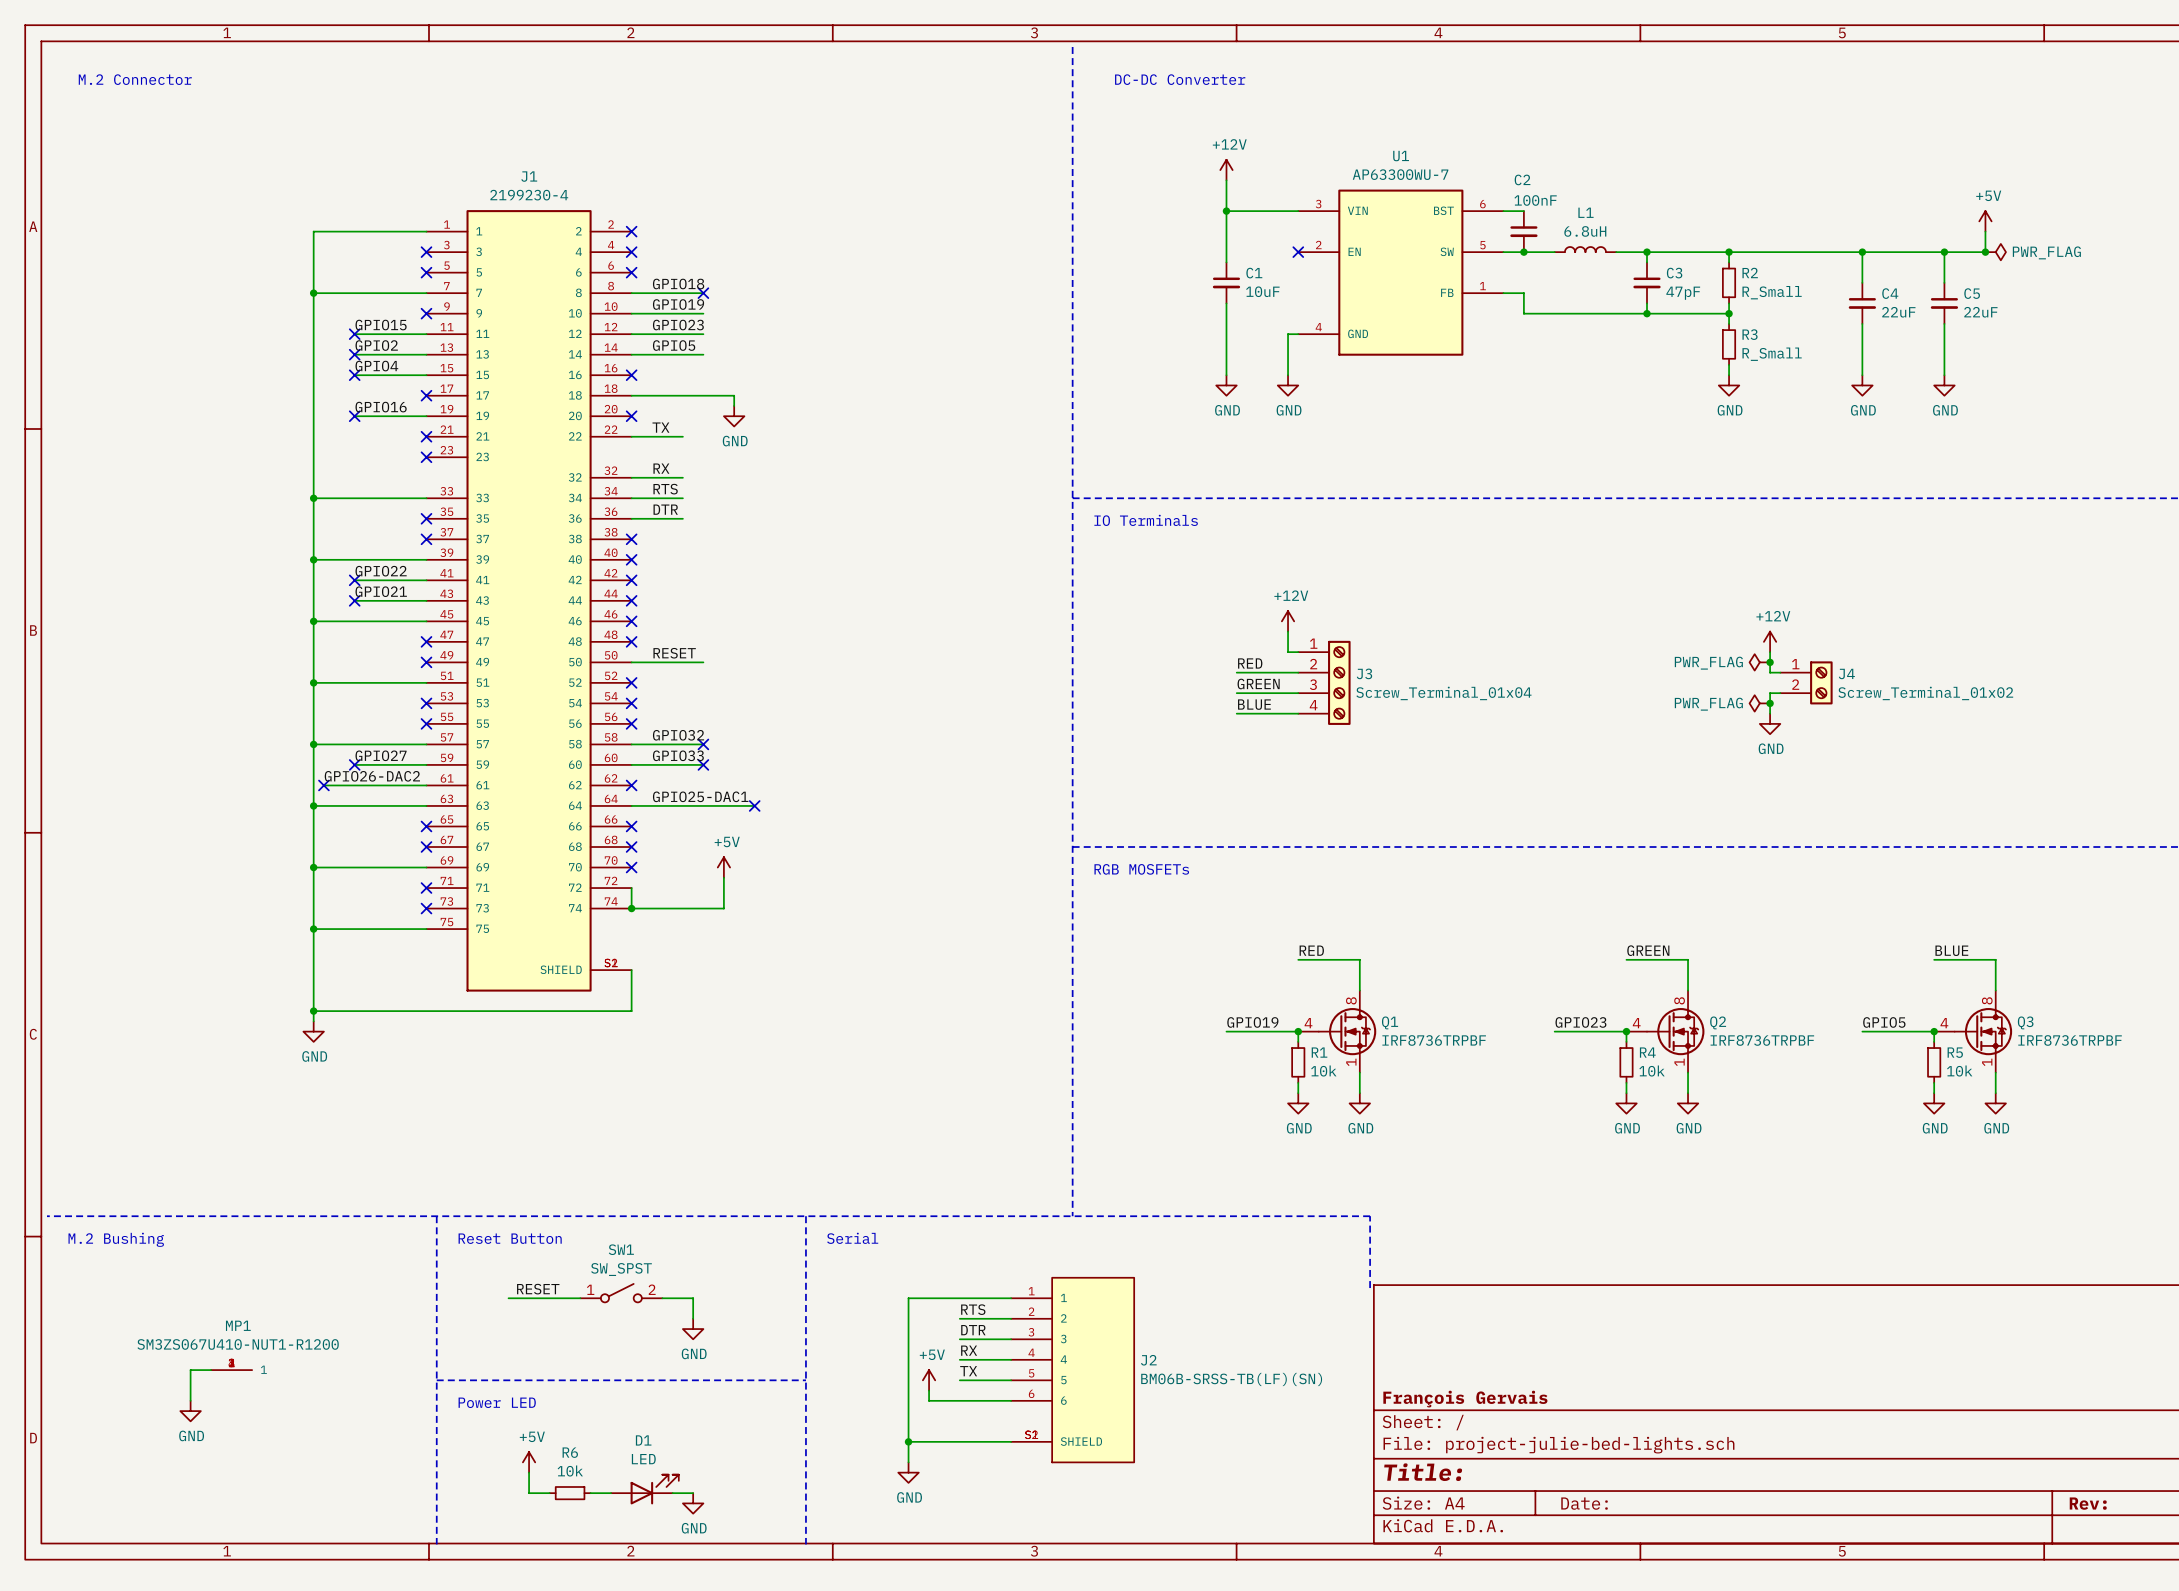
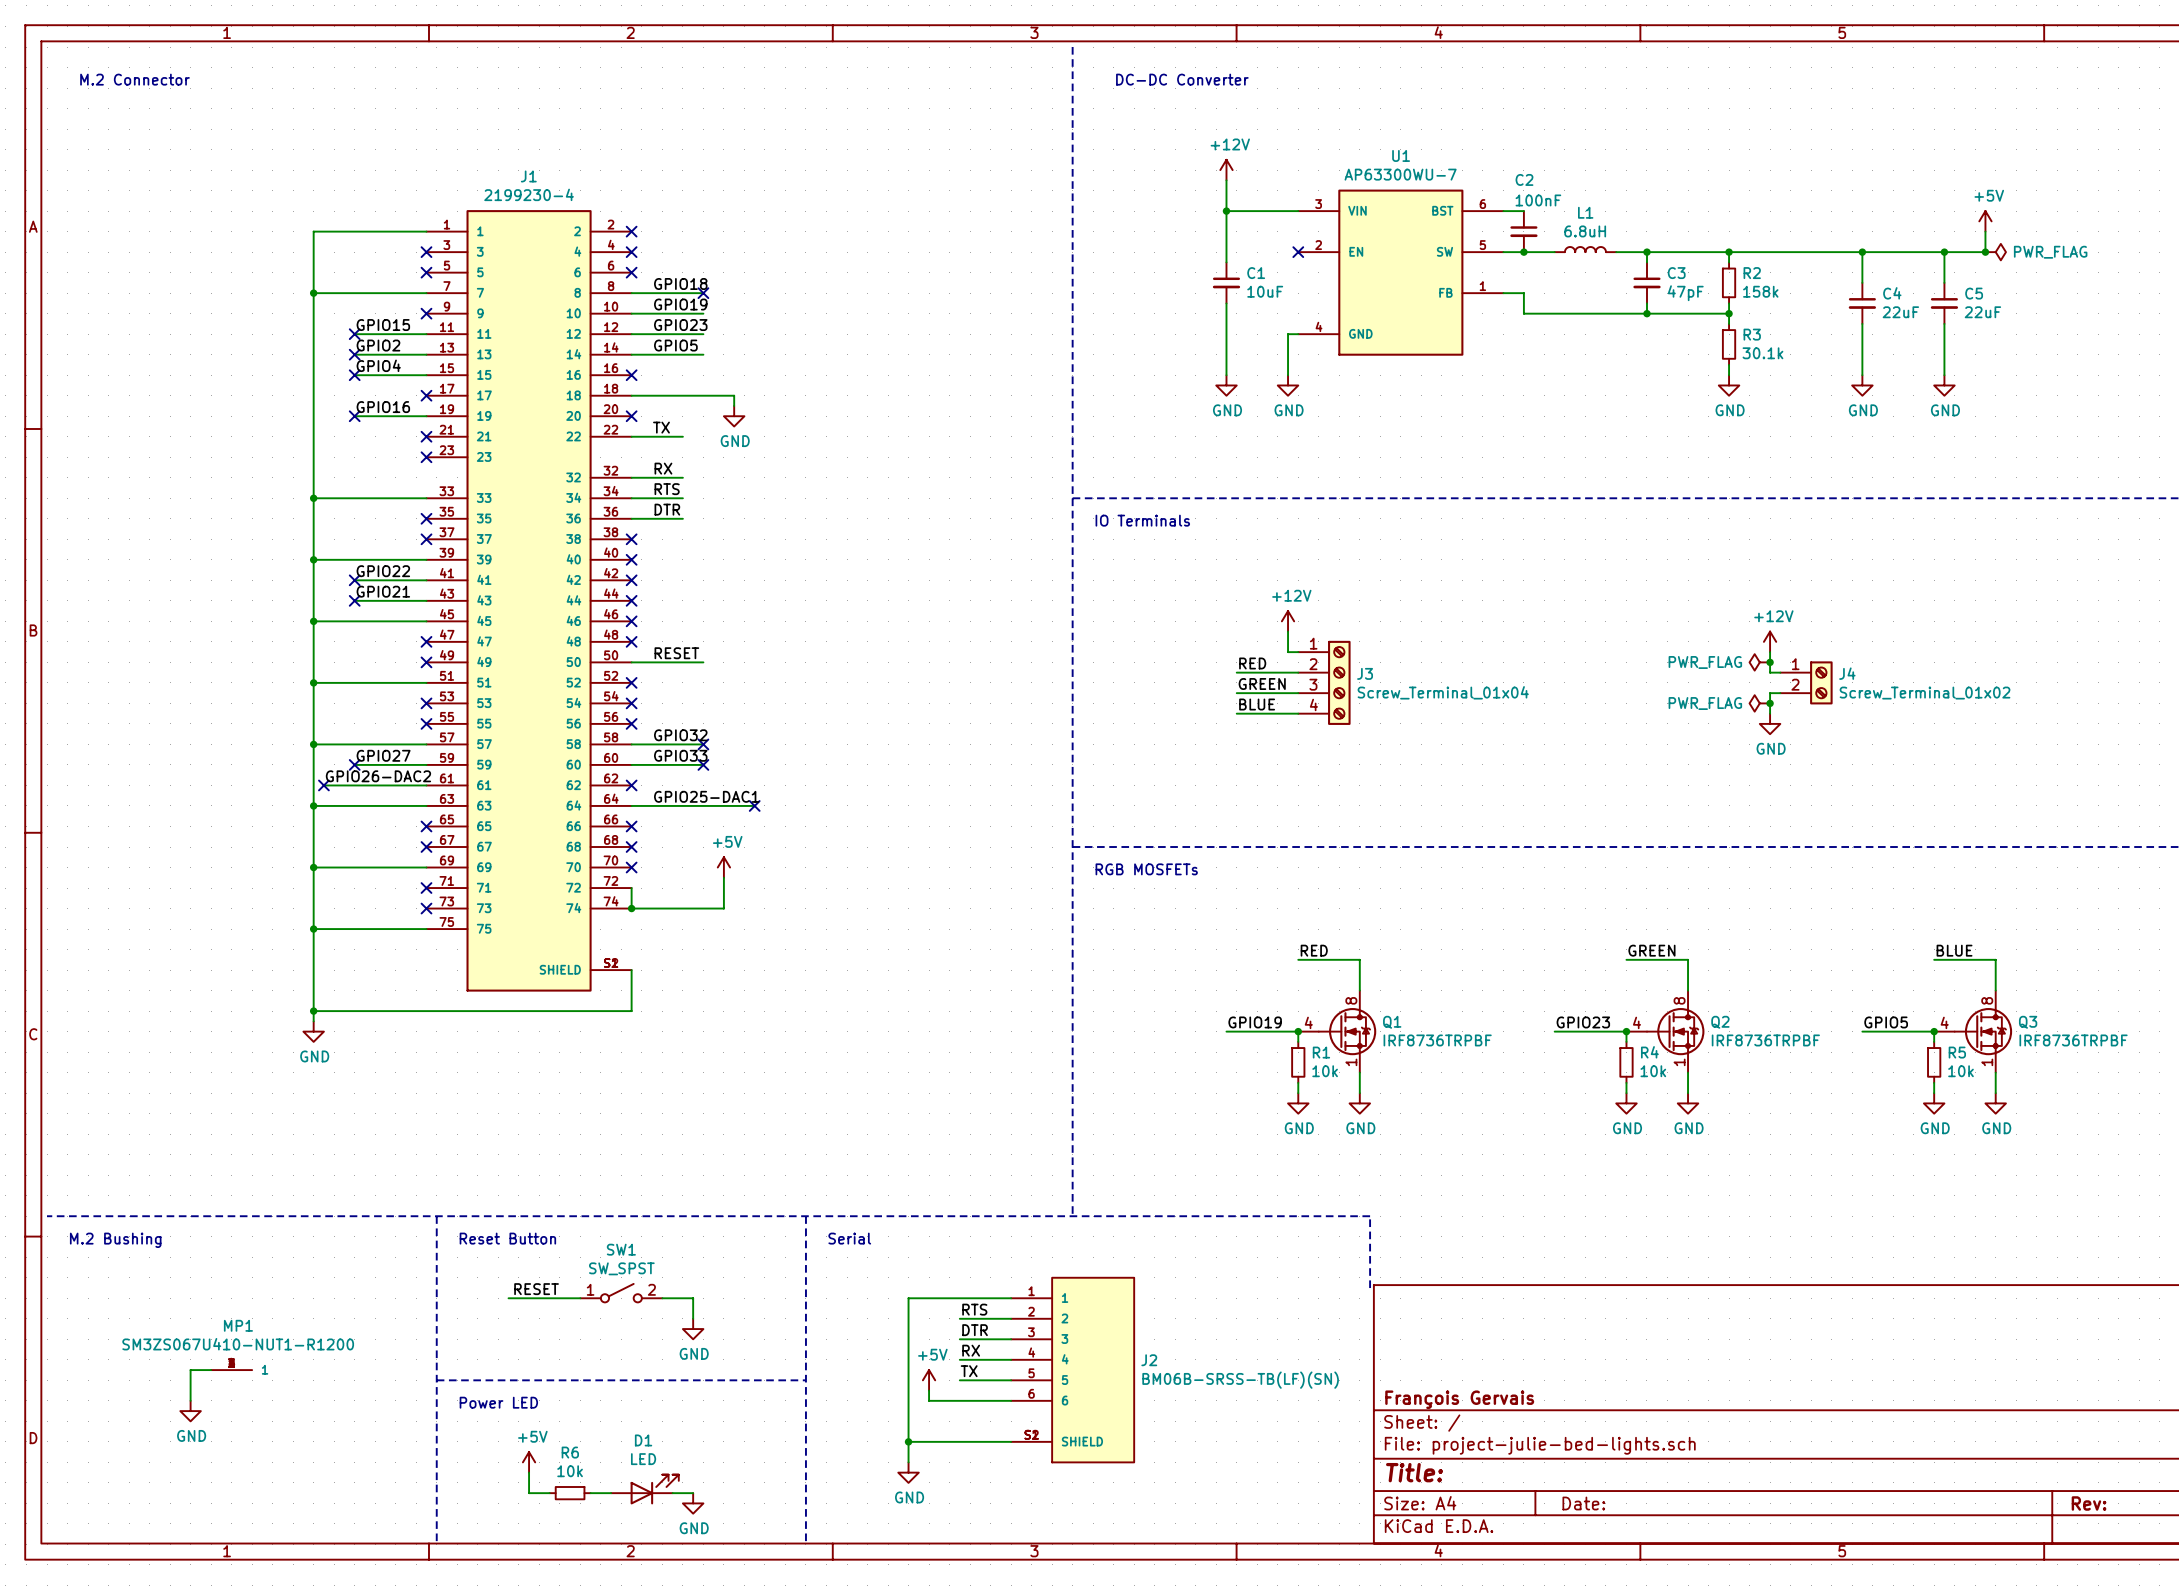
R2 value: R_Small (1772, 292) -> 158k (1760, 291)
R3 value: R_Small (1772, 354) -> 30.1k (1762, 353)

